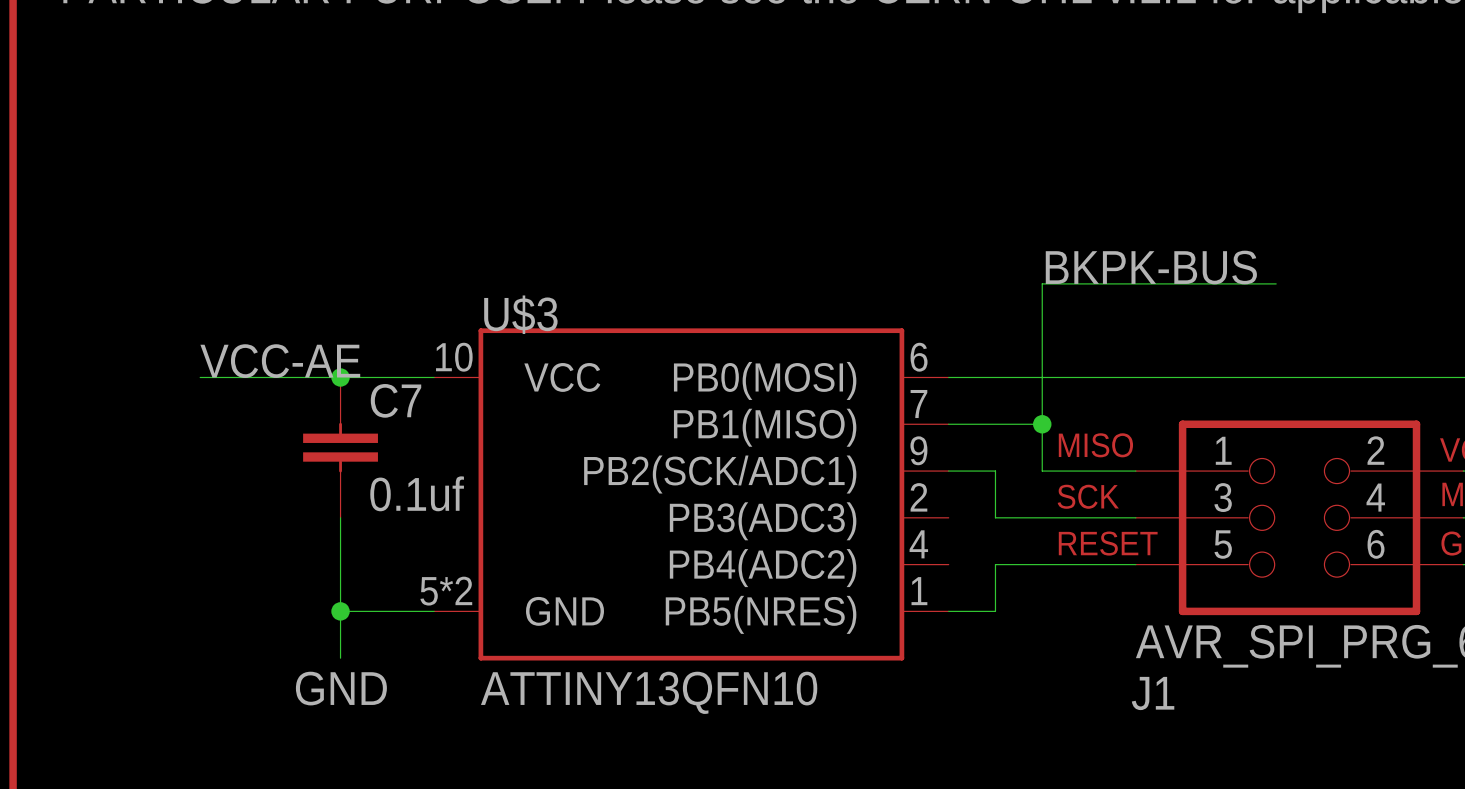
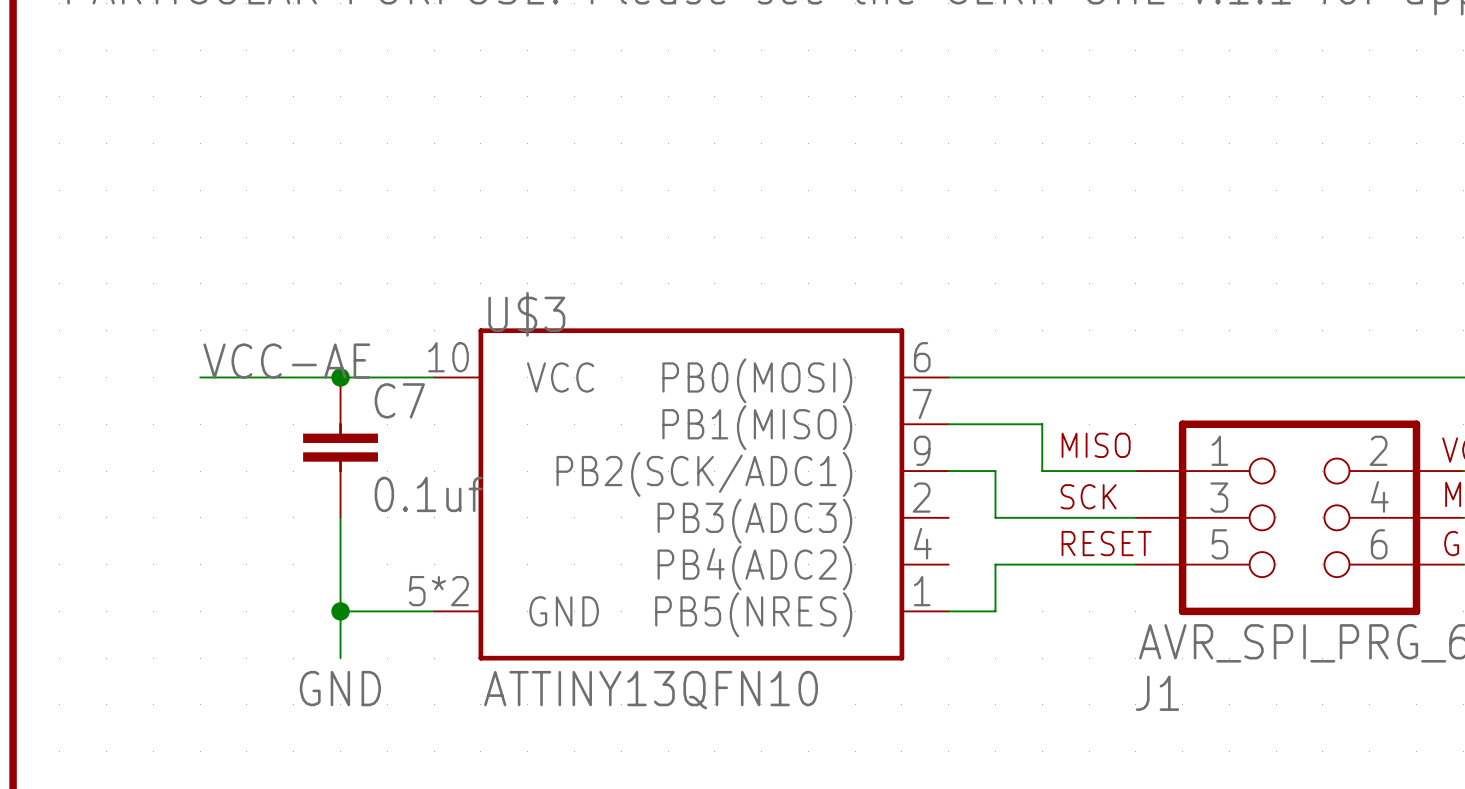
label: BKPK-BUS (1151, 267) -> none
wire: (1276, 283) (1042, 283) (1042, 424) -> none
junction: (1042, 424) -> none

